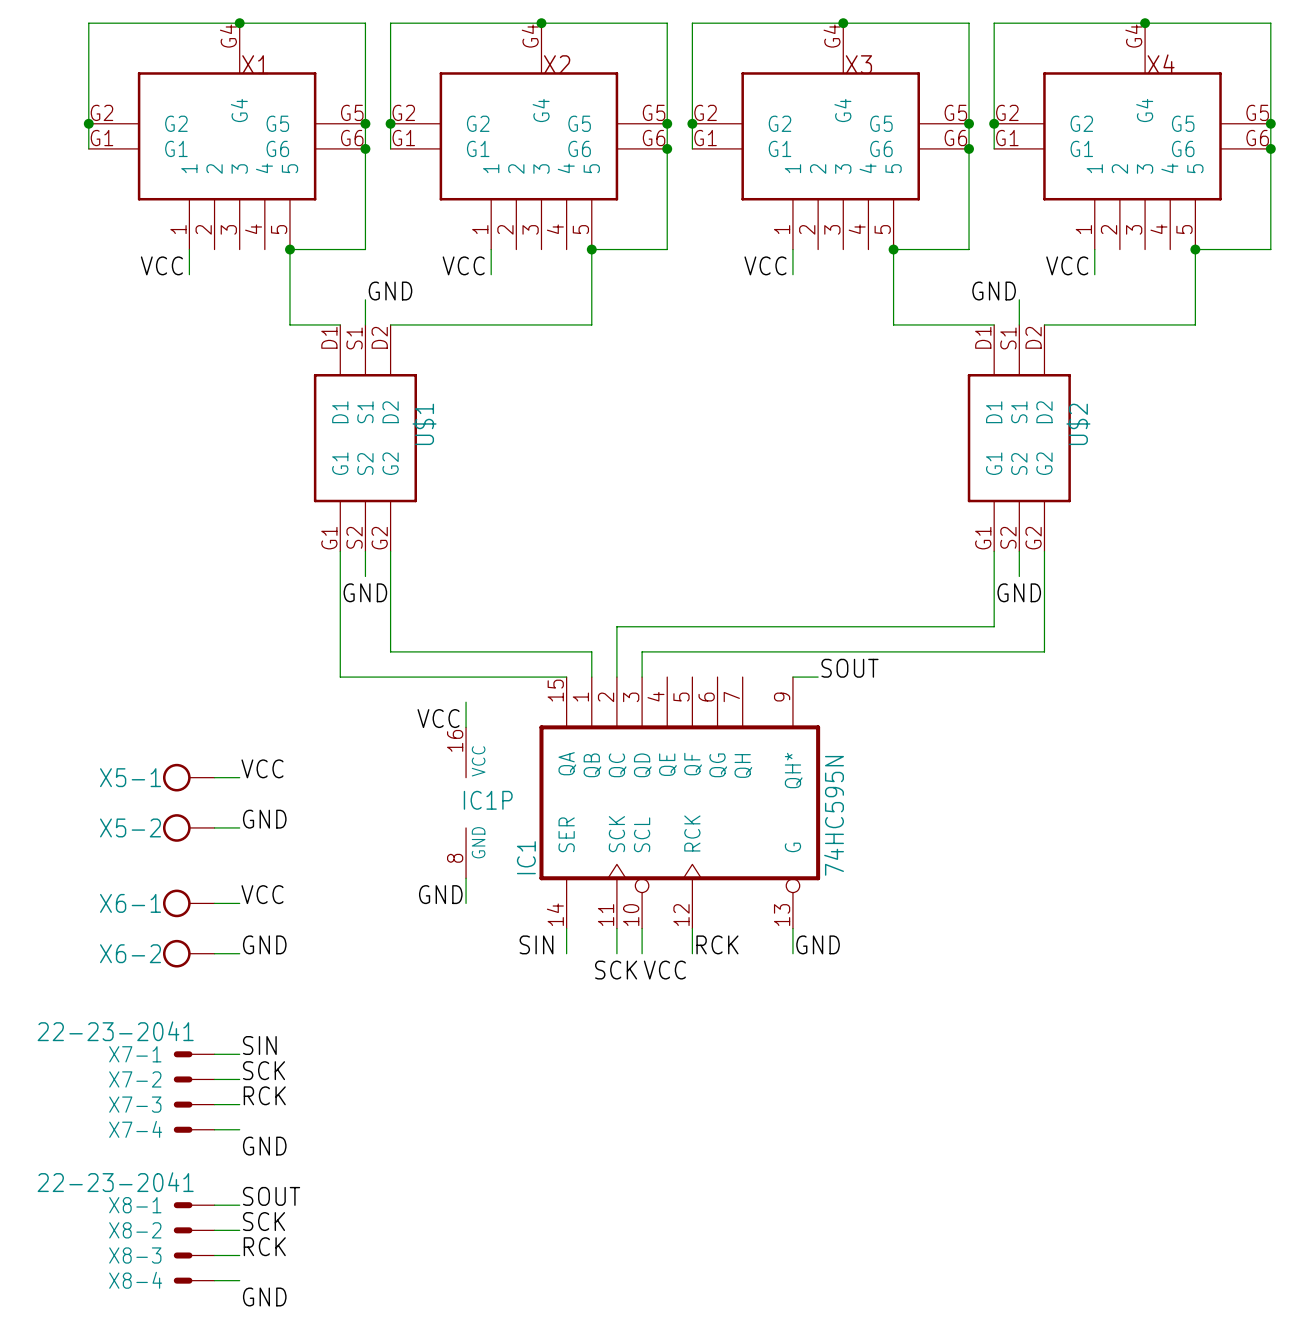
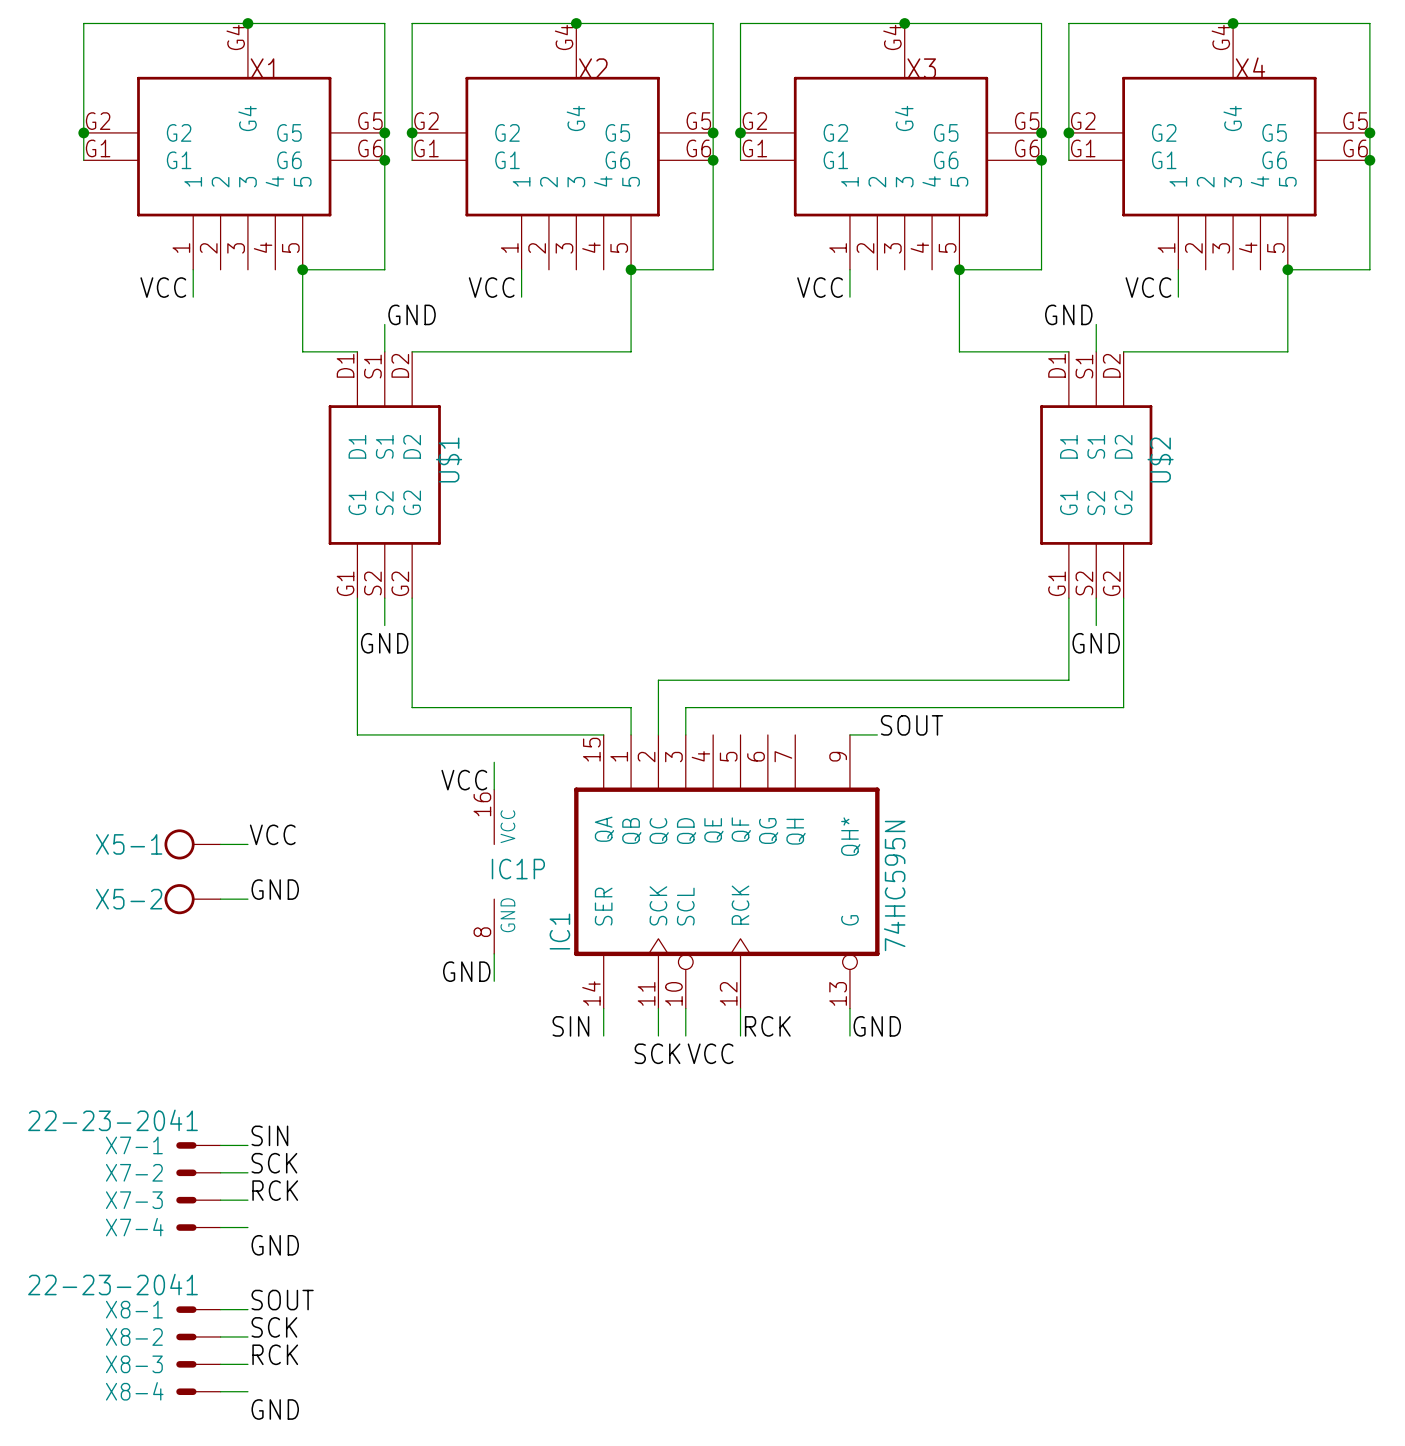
label: VCC (262, 894) -> none
X6-1: (188, 903) -> none
wire: (214, 903) (239, 903) -> none
label: GND (264, 944) -> none
X6-2: (188, 953) -> none
wire: (214, 953) (239, 953) -> none

